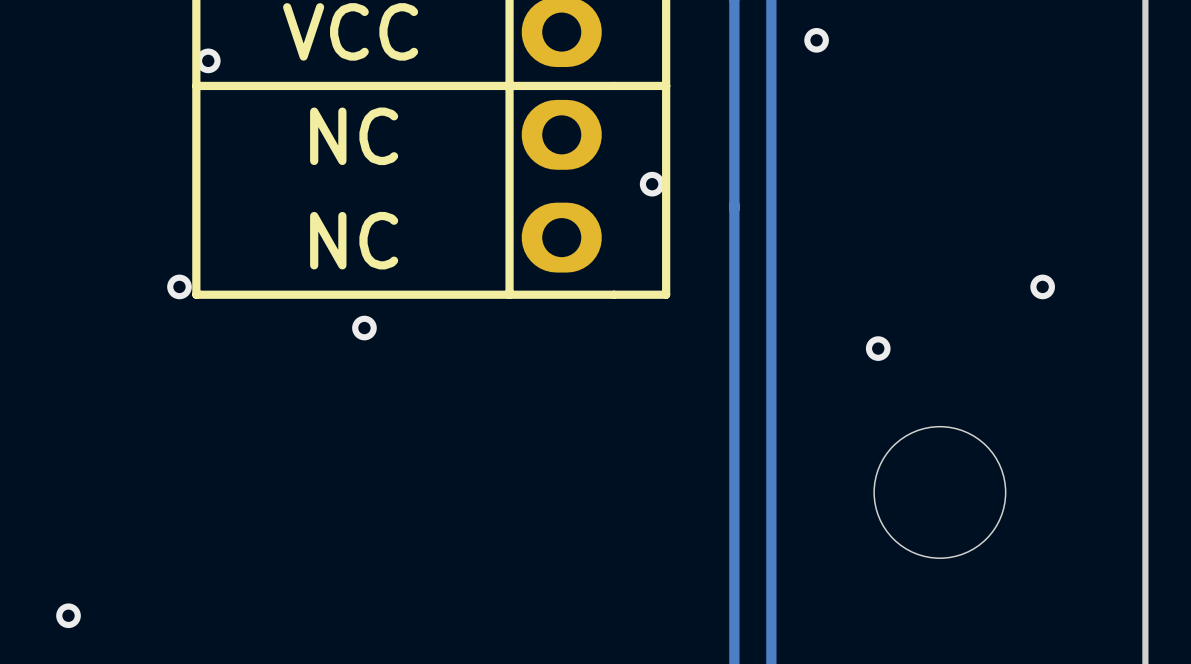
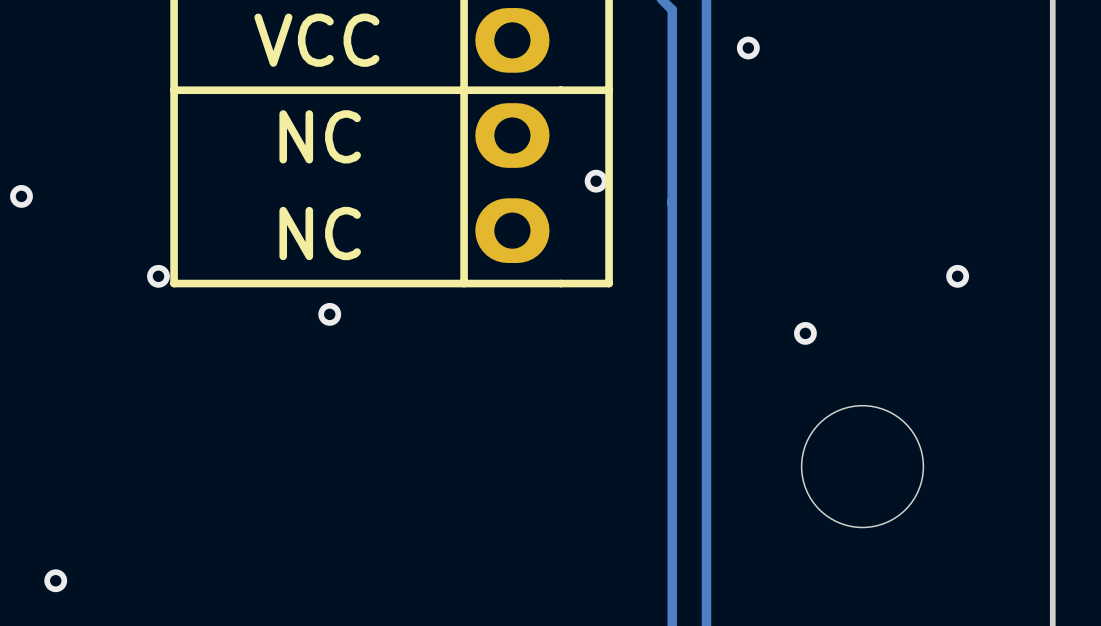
via position: (208, 60) -> (21, 196)

